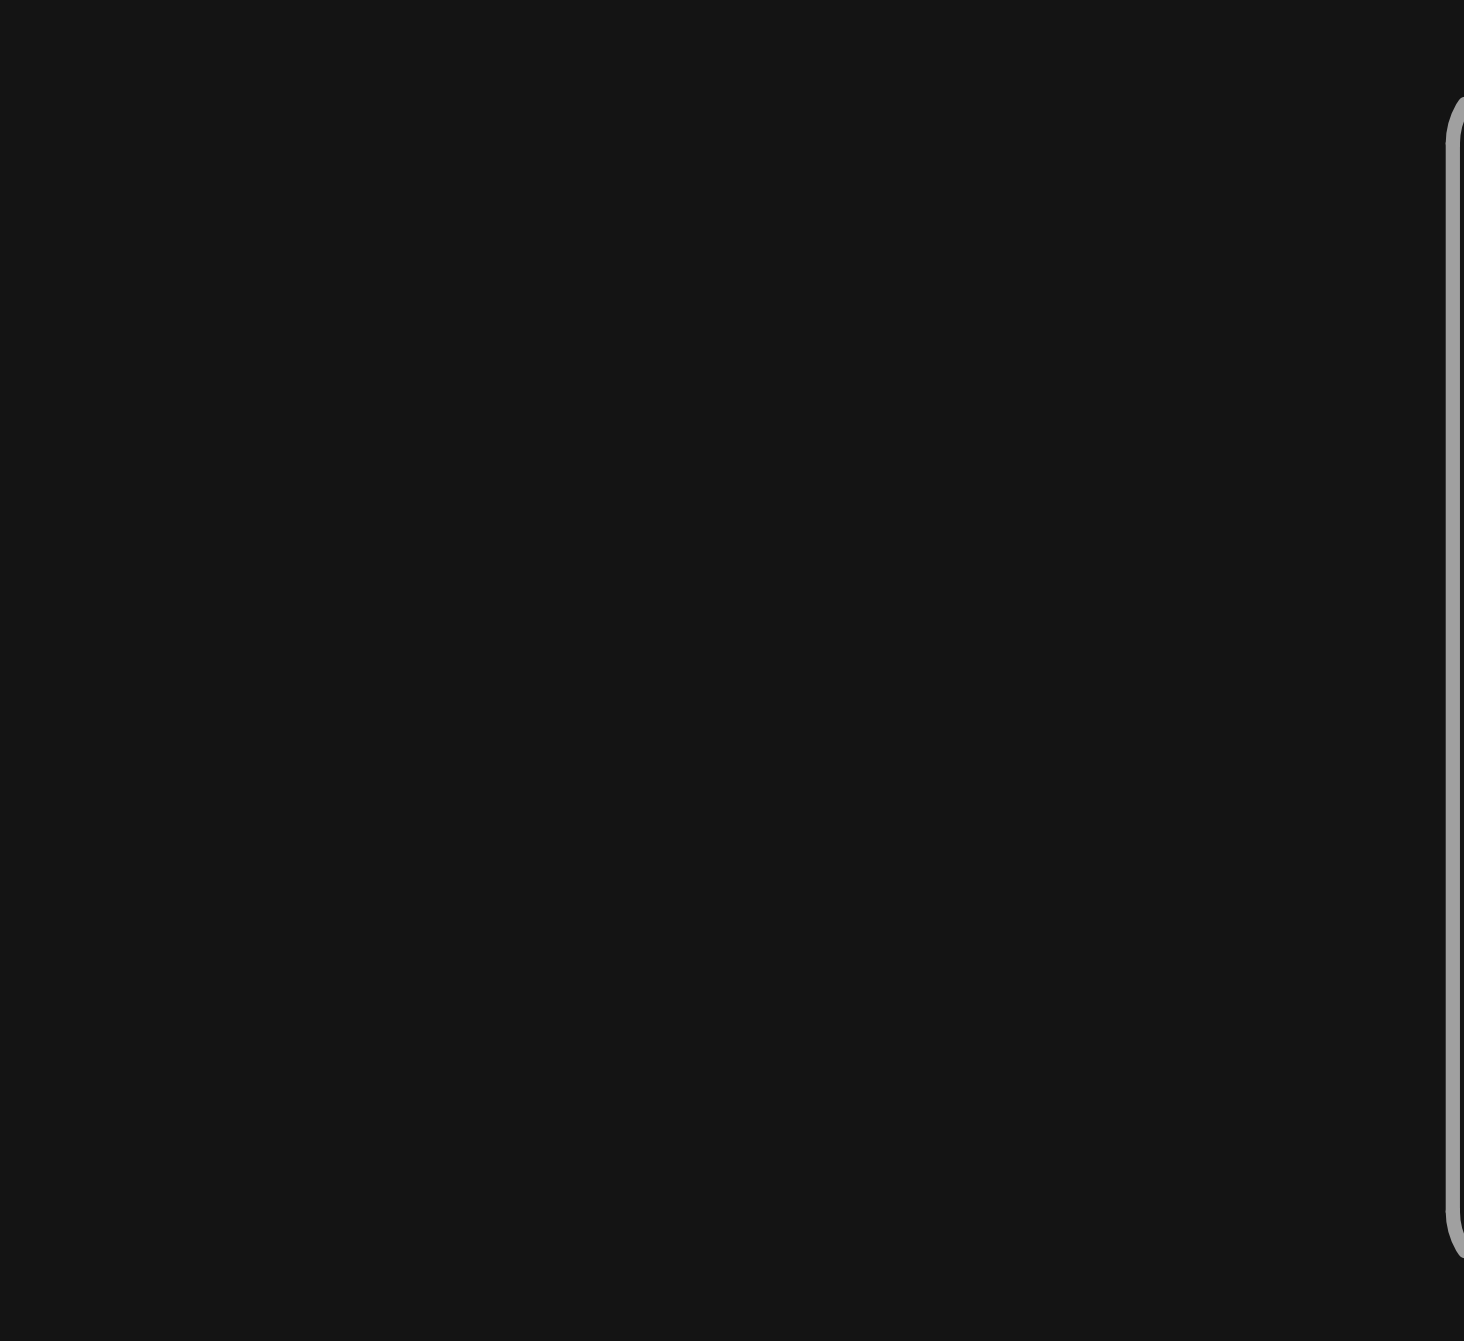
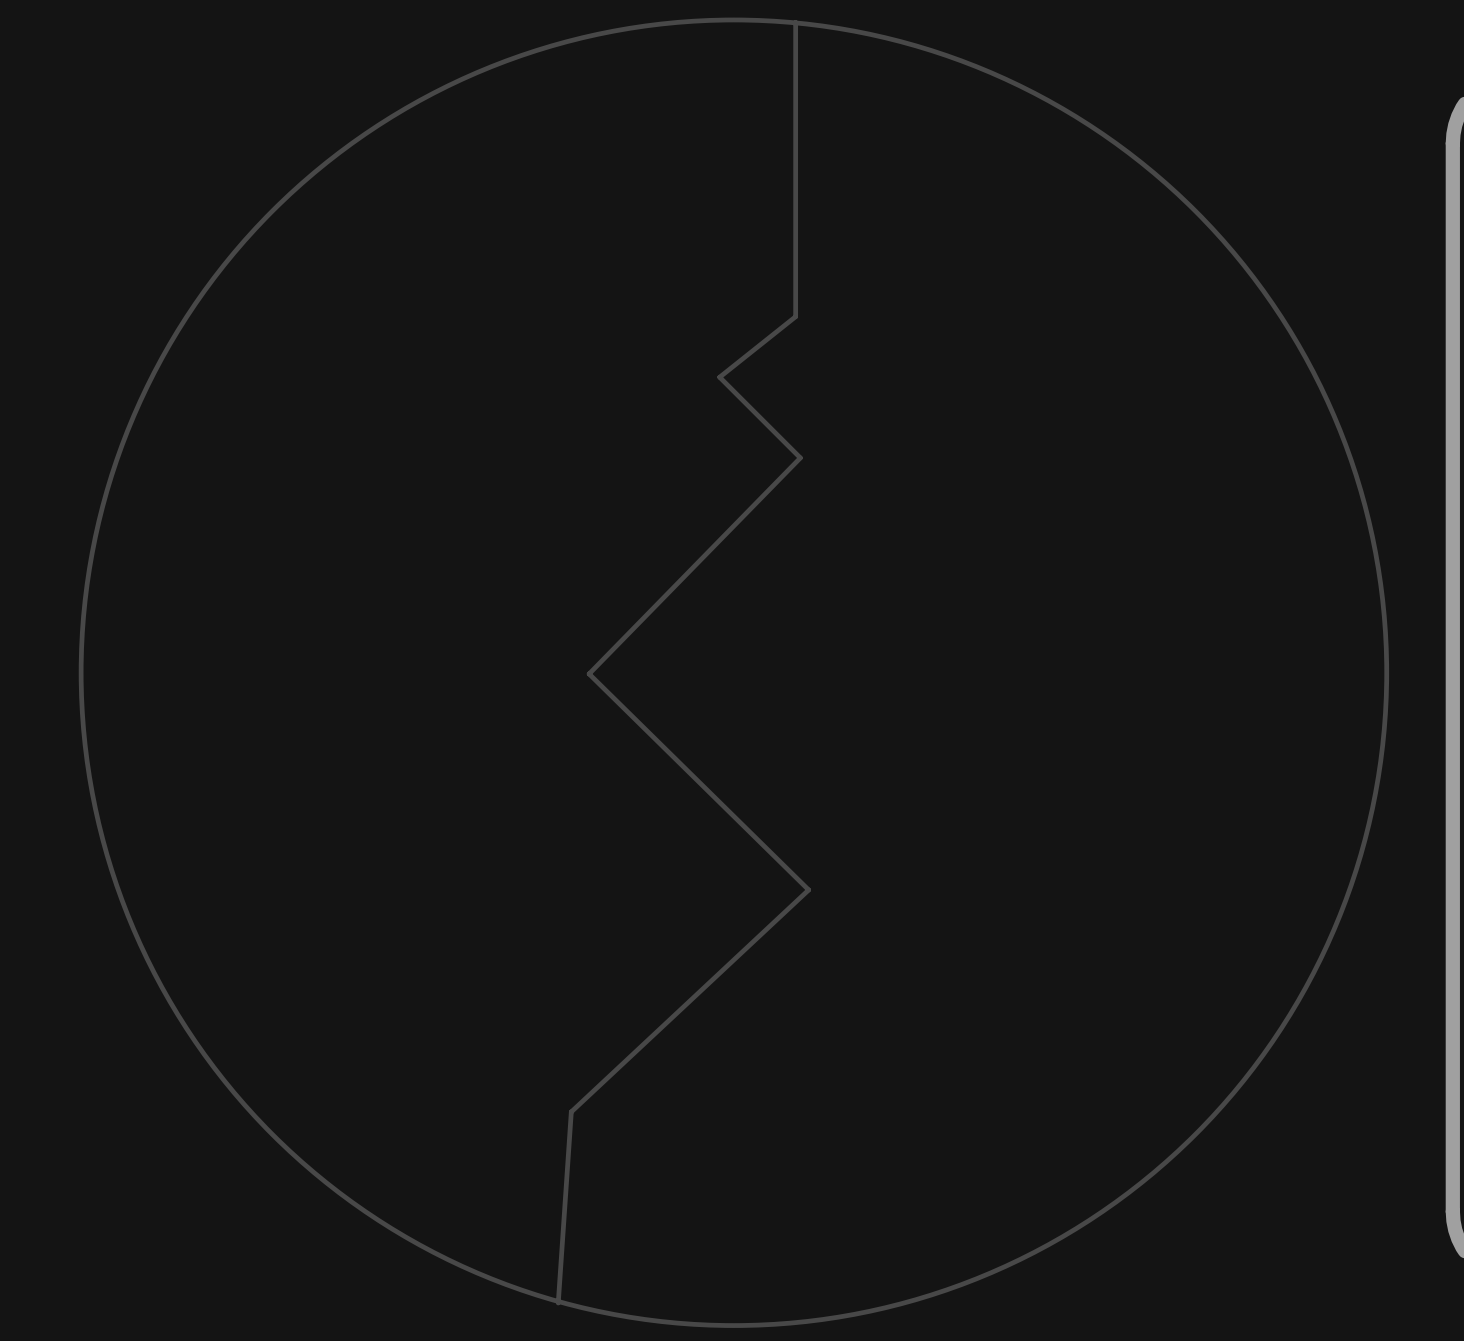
drawing: none -> [78, 17, 1390, 1328]
track: none -> (795, 22) (795, 316) (719, 377) (800, 457) (589, 673) (808, 889) (571, 1111) (558, 1303)

